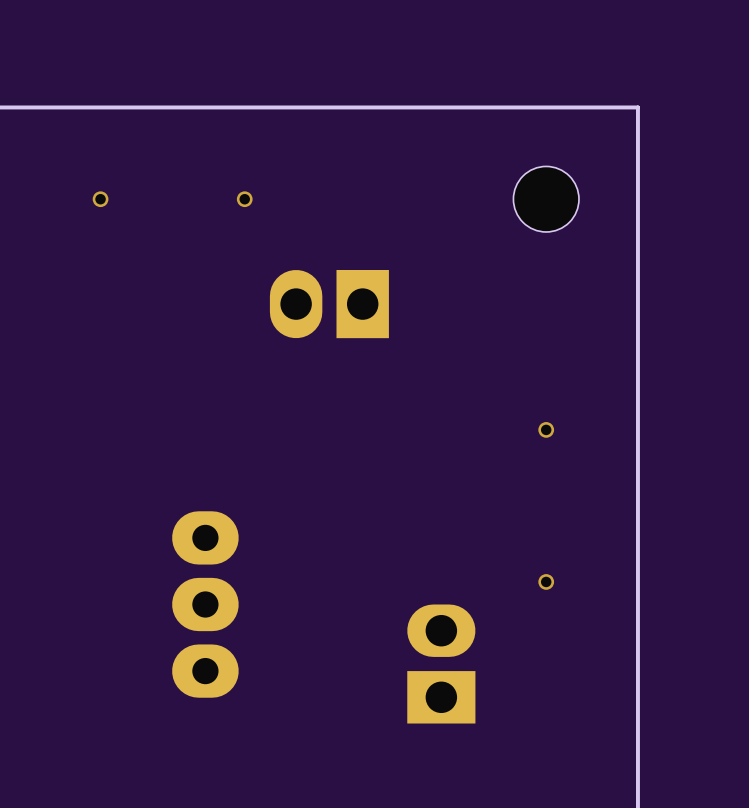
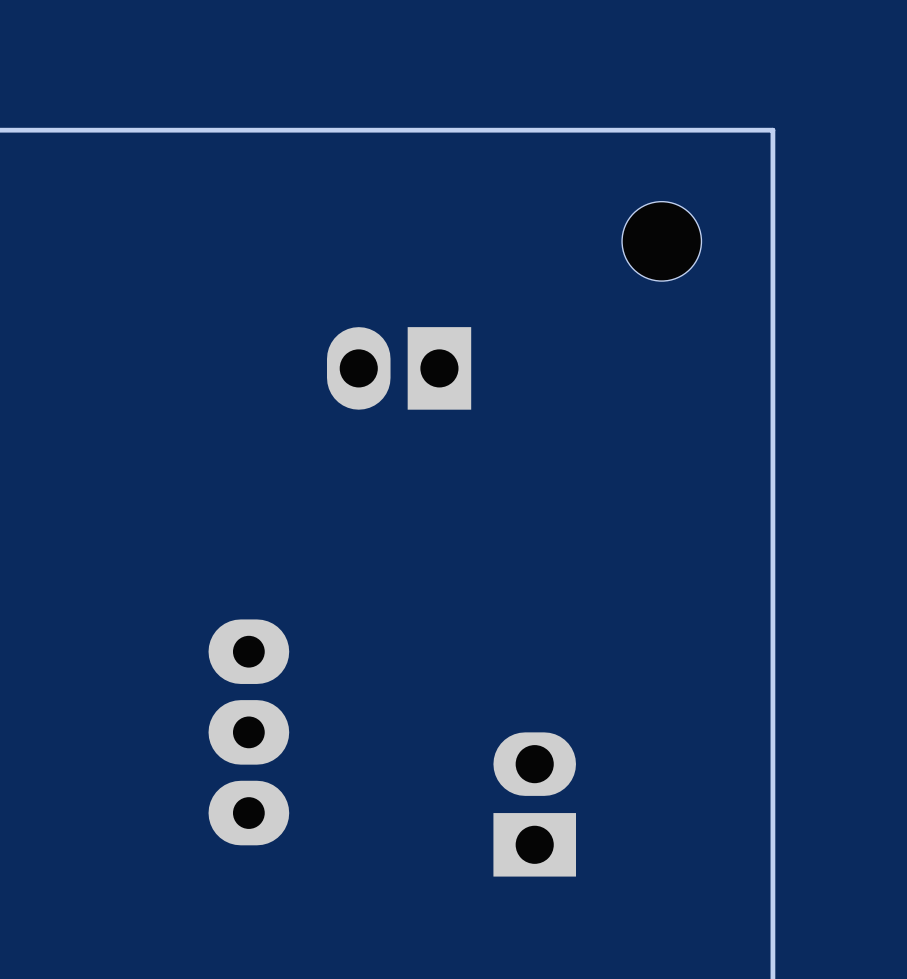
via: (100, 199) -> none
via: (244, 199) -> none
via: (546, 429) -> none
via: (546, 581) -> none

